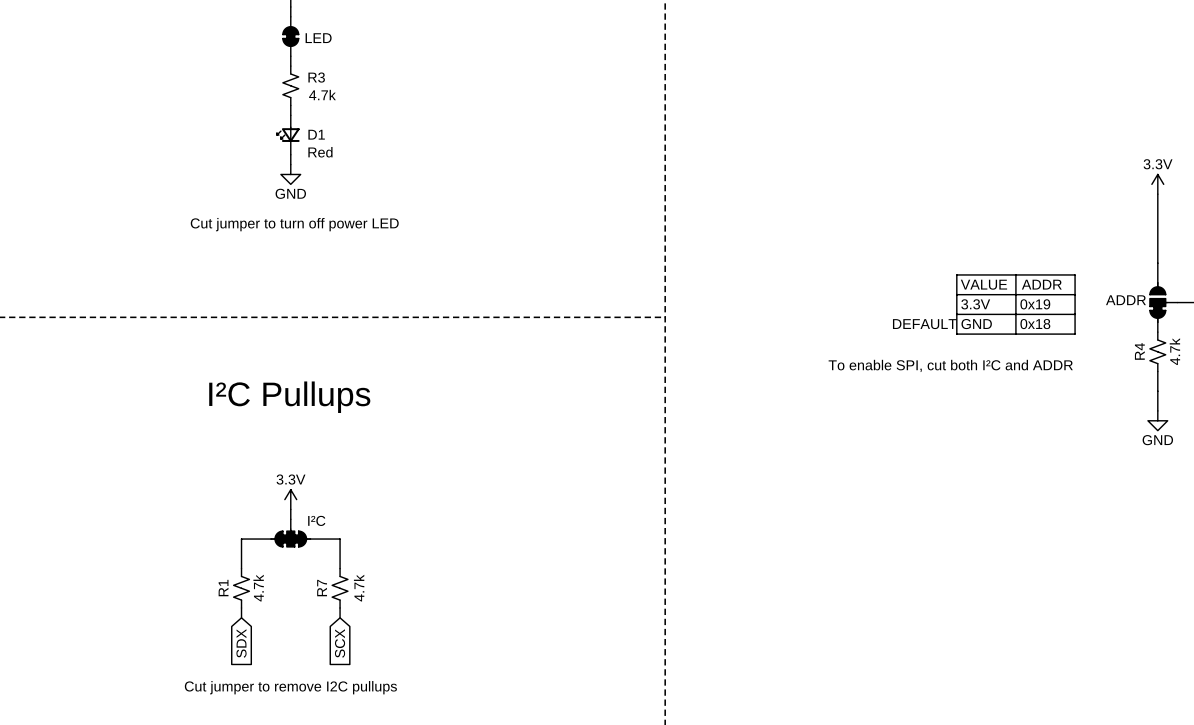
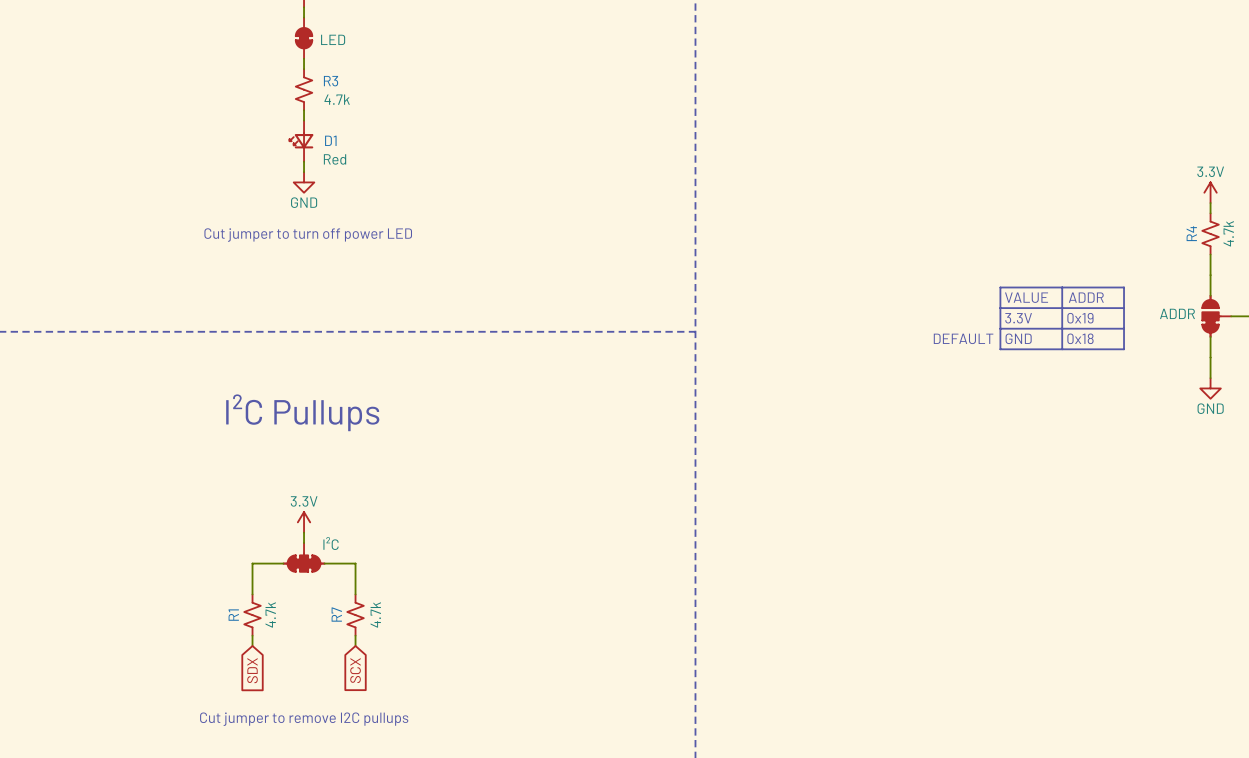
R4 position: (1157, 351) -> (1210, 233)
text: To enable SPI, cut both I²C and ADDR (950, 365) -> none
wire: (1157, 371) (1157, 410) -> none
power symbol position: GND (1157, 420) -> GND (1210, 388)

